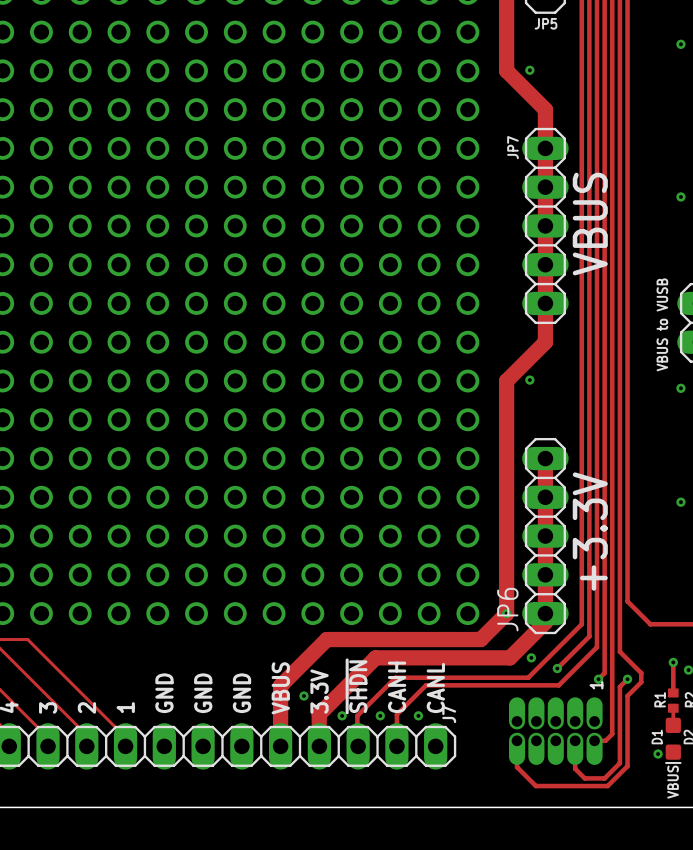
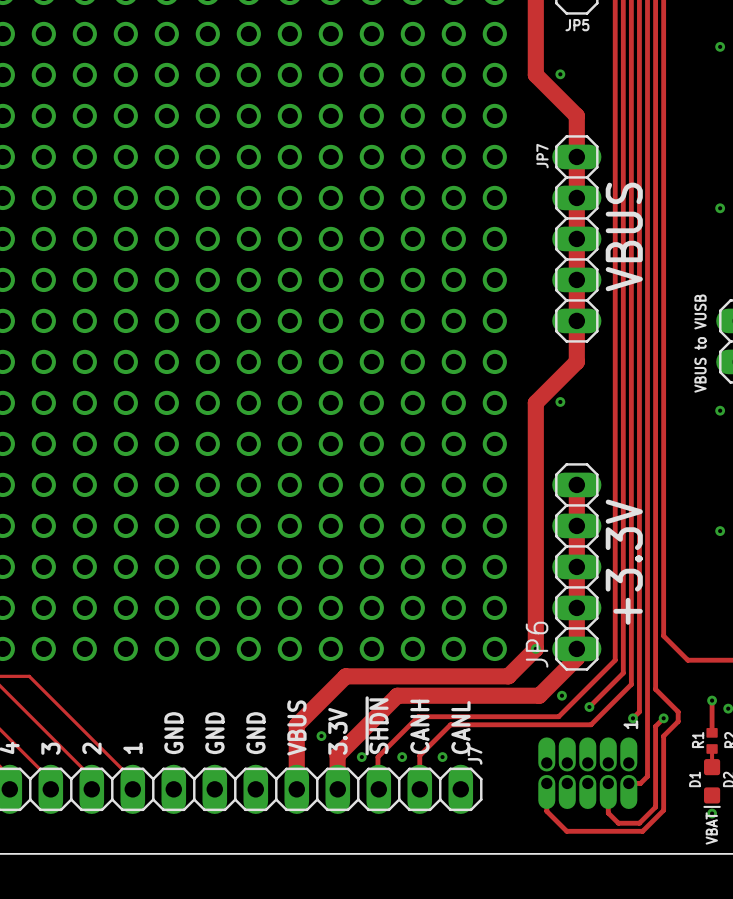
via: (658, 754) -> none
via: none -> (712, 813)
text: VBUS (673, 782) -> VBAT (711, 828)

